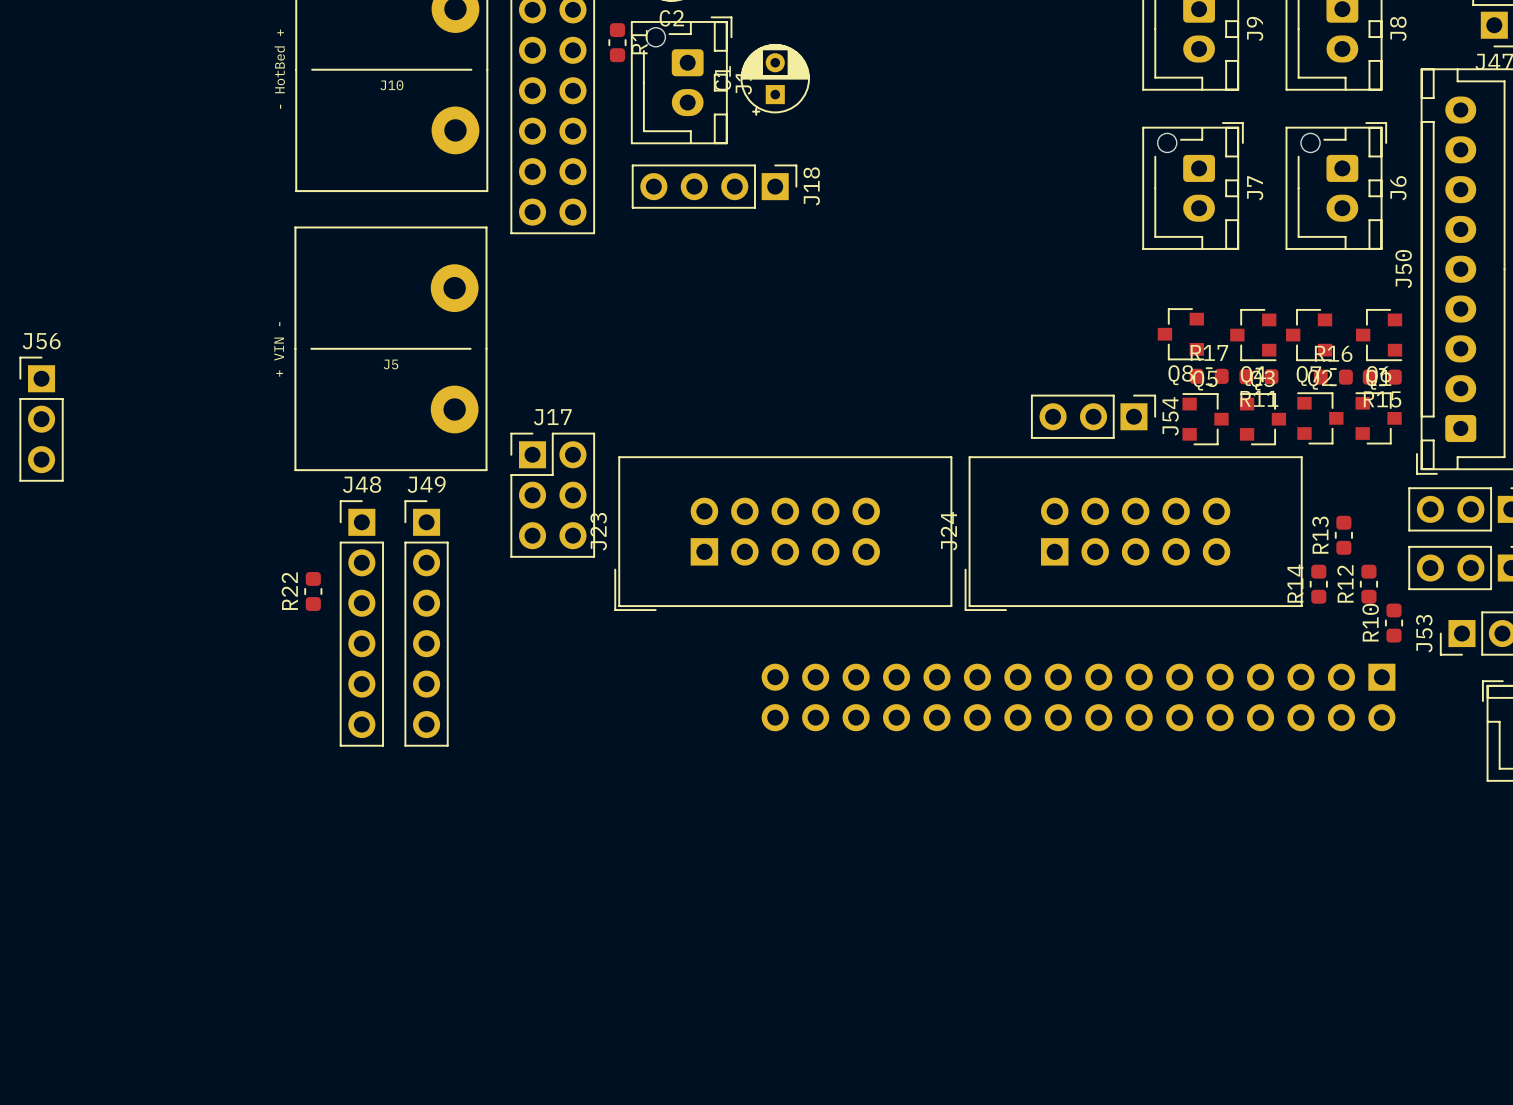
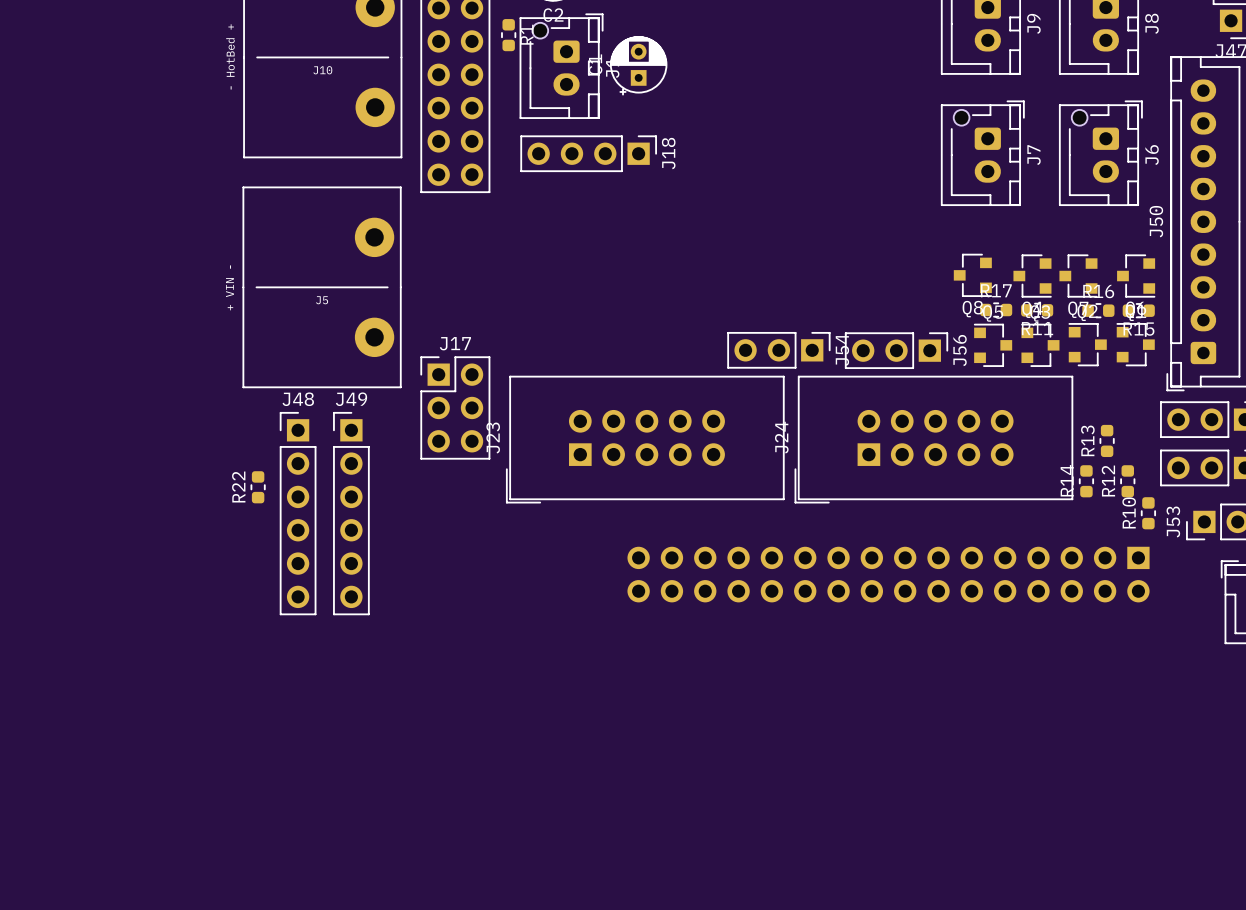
J54 position: (1093, 416) -> (778, 350)
J56 rotation: 0° (41, 419) -> 90° clockwise (896, 350)
J56 position: (41, 419) -> (896, 350)

